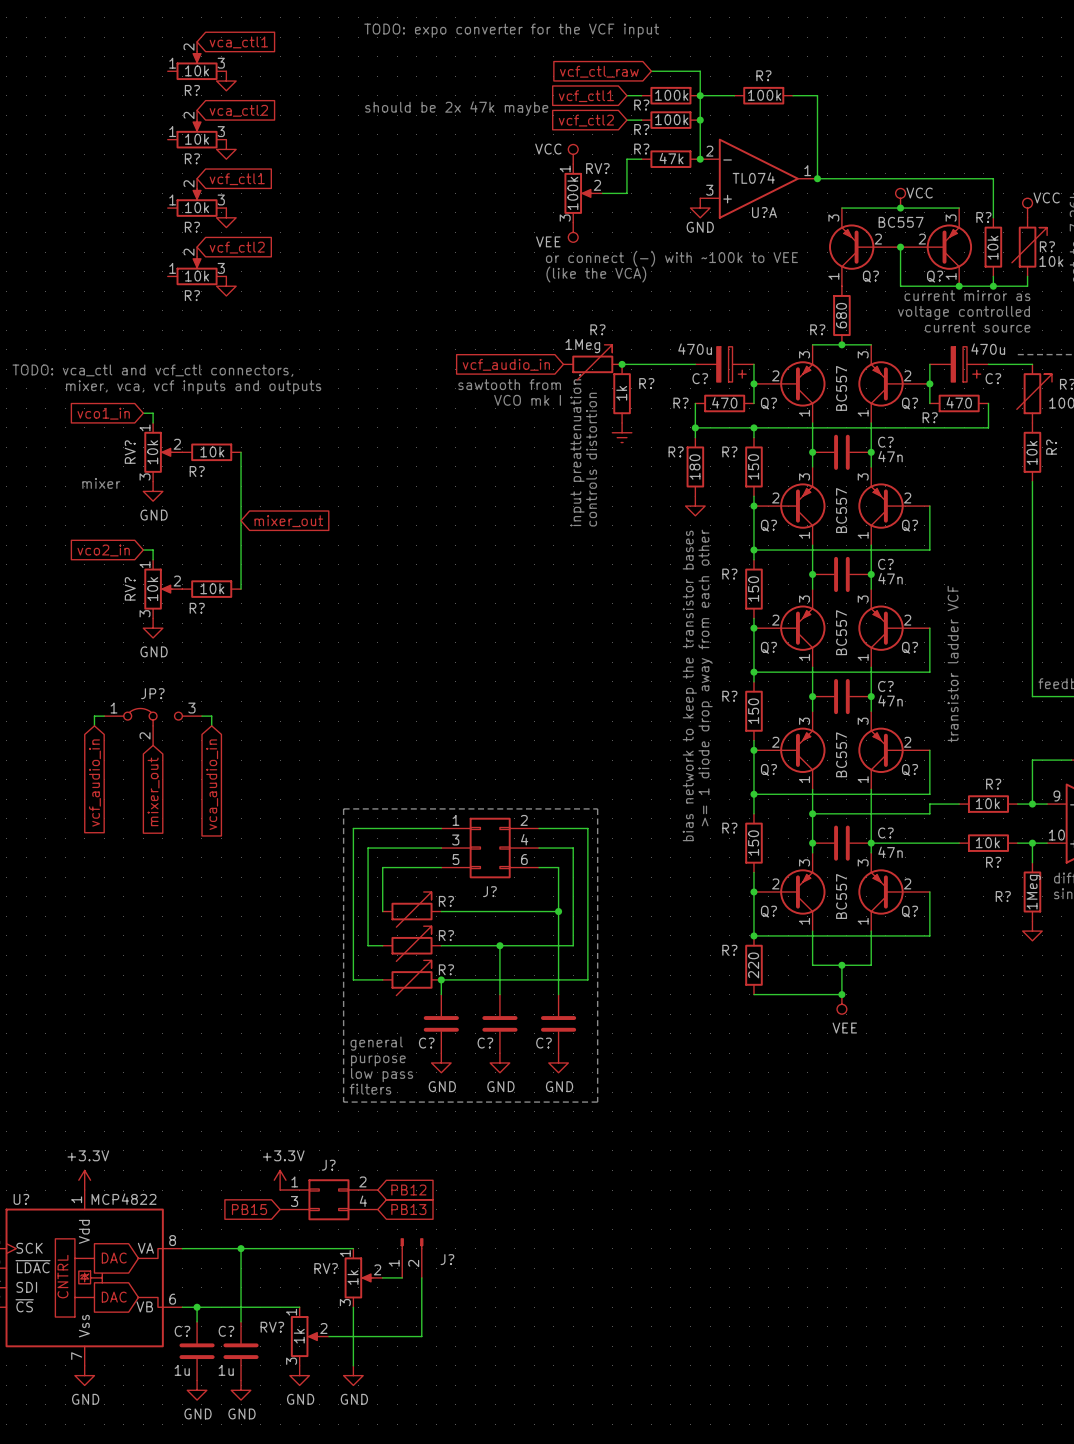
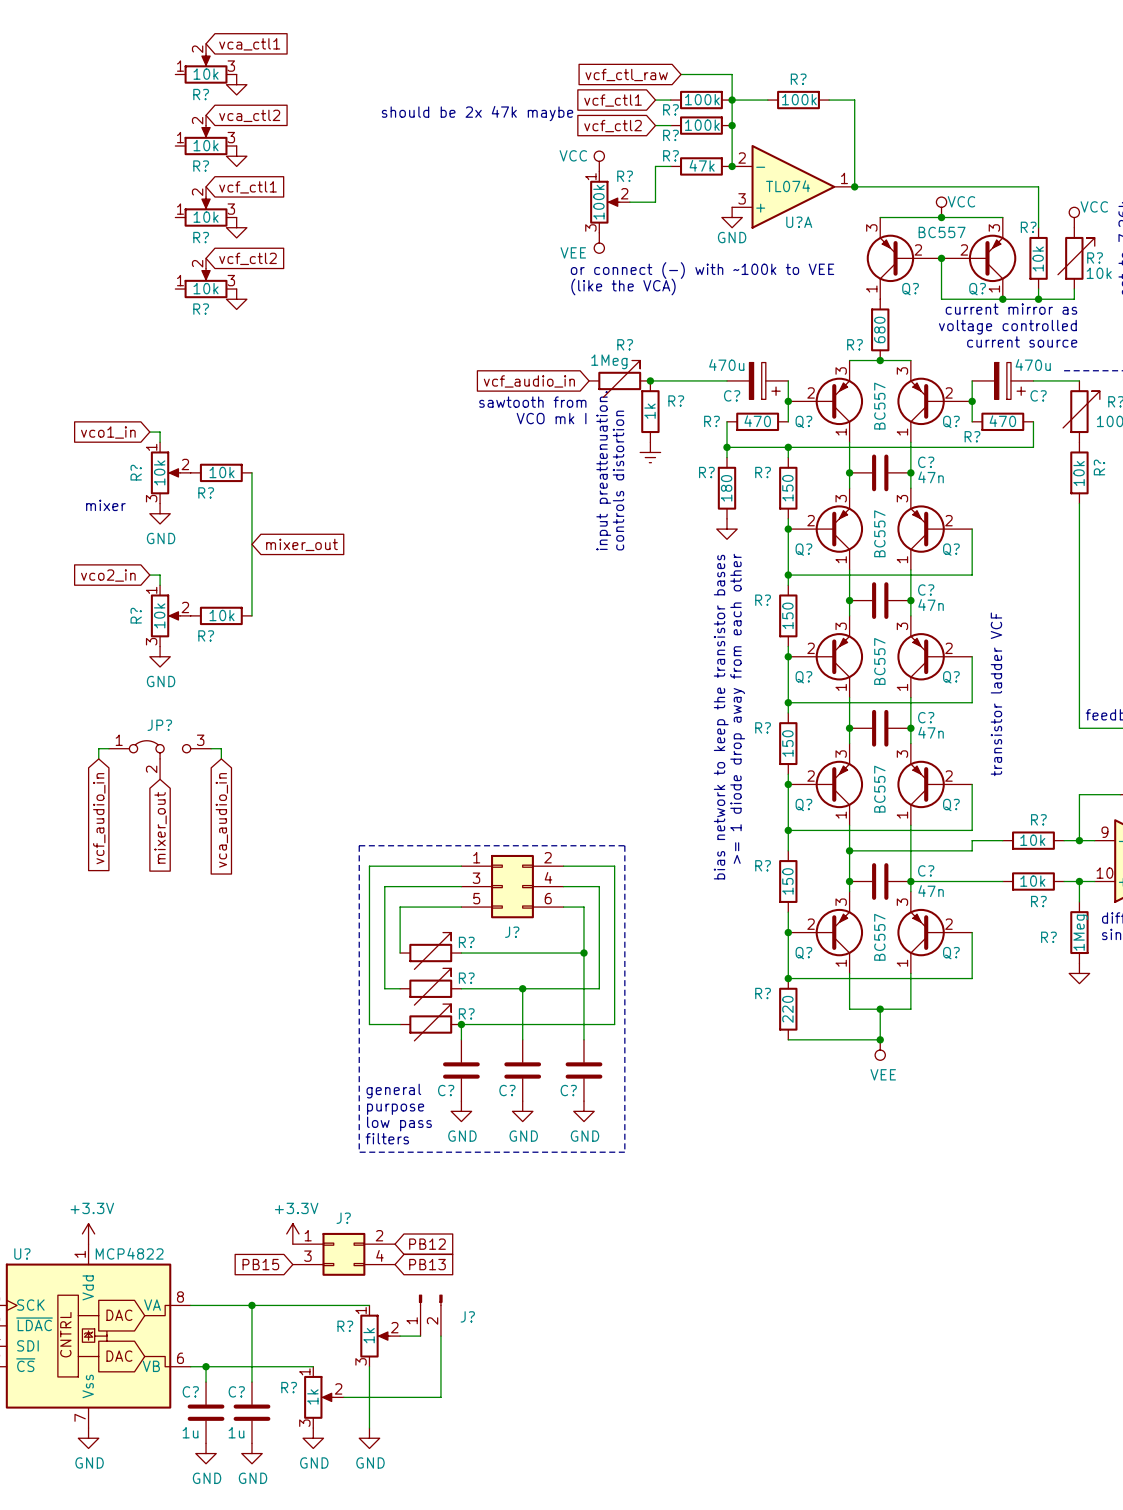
text: TODO: expo converter for the VCF input (511, 30) -> none
RV? name: RV? (597, 168) -> R? (625, 176)
text: TODO: vca_ctl and vcf_ctl connectors, (152, 370) -> none
text: mixer, vca, vcf inputs and outputs (193, 387) -> none
RV? name: RV? (130, 452) -> R? (136, 472)
RV? name: RV? (130, 588) -> R? (136, 615)
RV? name: RV? (326, 1268) -> R? (345, 1326)
RV? name: RV? (272, 1327) -> R? (289, 1387)

